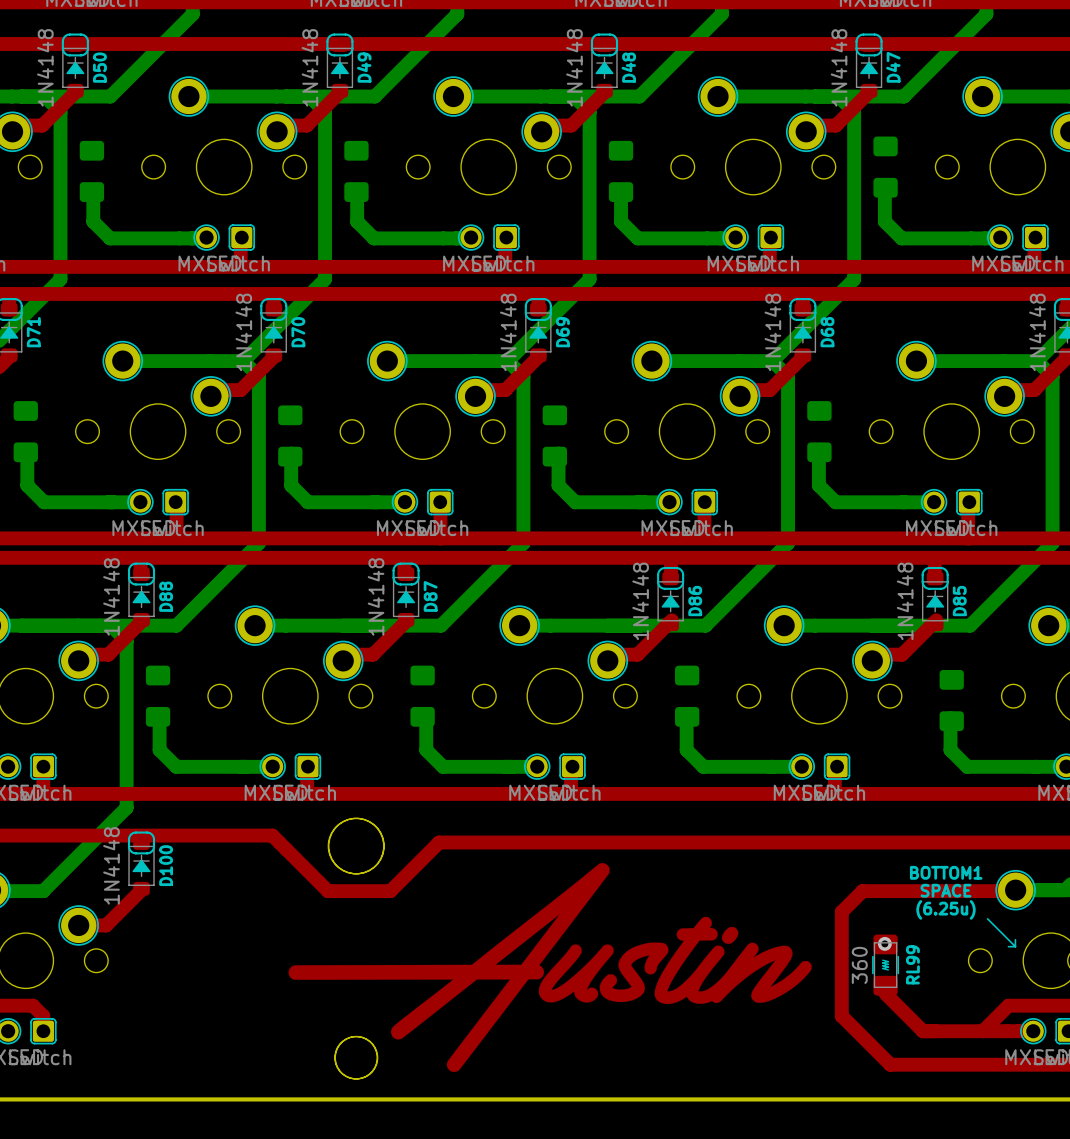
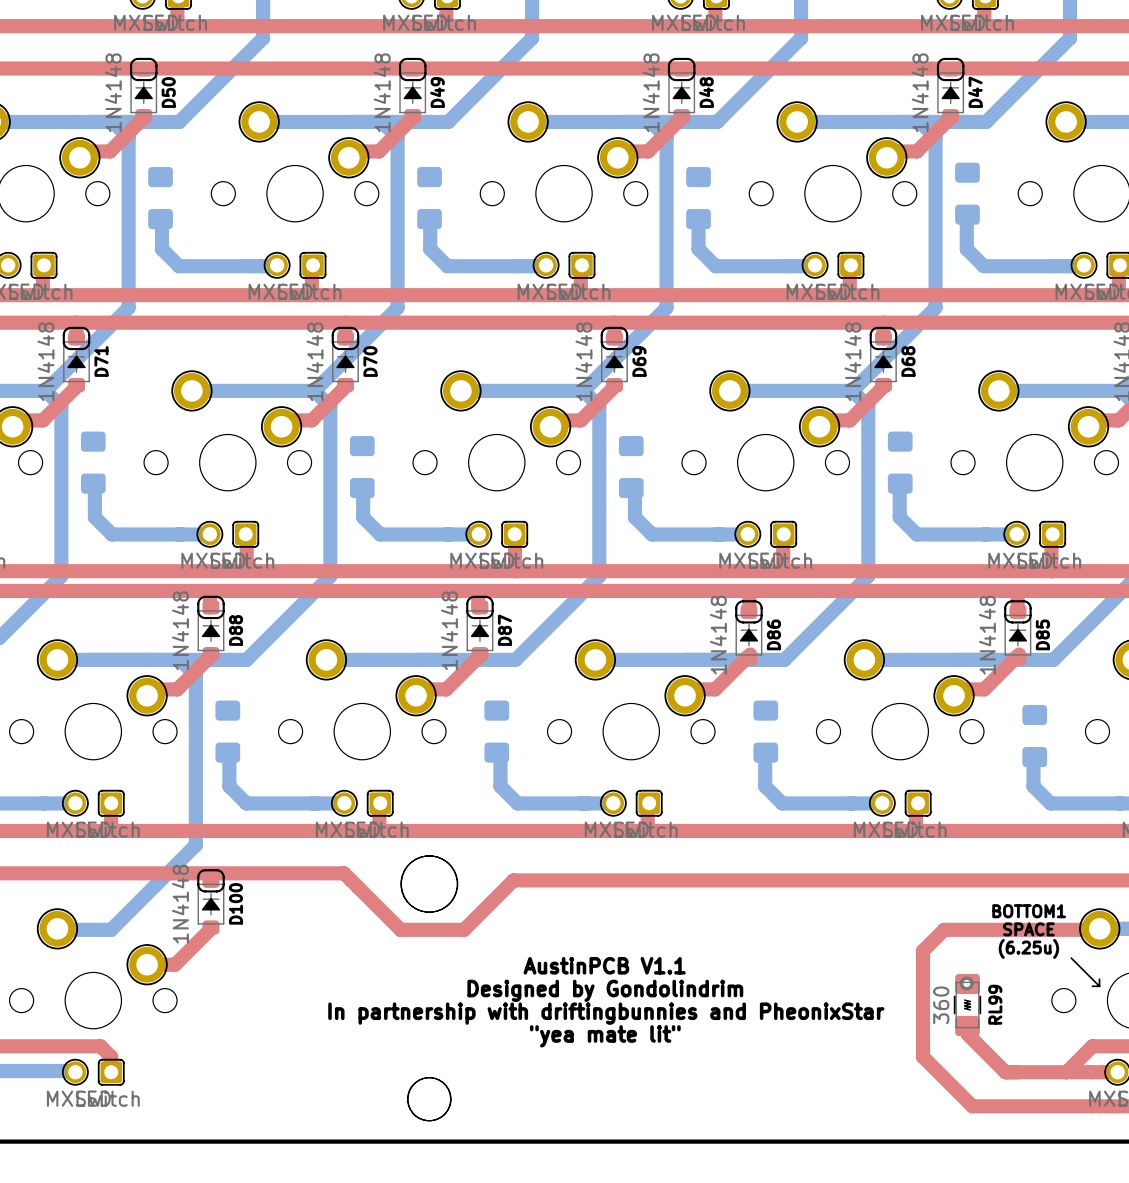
text: none -> AustinPCB V1.1 (604, 965)
text: none -> Designed by Gondolindrim (605, 990)
part: (550, 967) -> none
text: none -> In partnership with driftingbunnies and PheonixStar (606, 1013)
text: none -> "yea mate lit" (605, 1036)

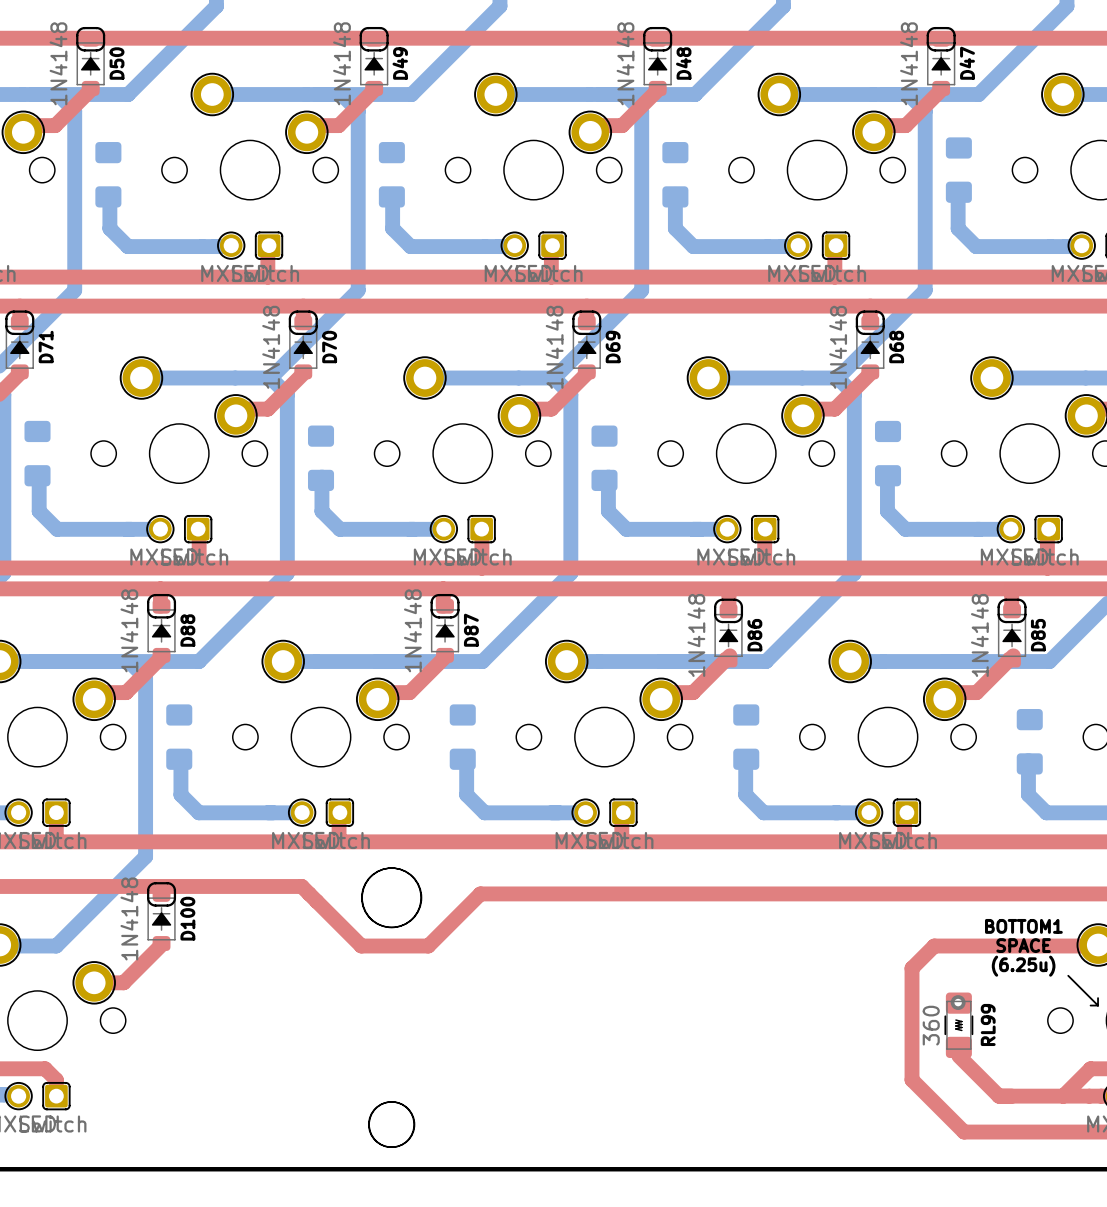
text: AustinPCB V1.1 (604, 965) -> none
text: Designed by Gondolindrim (605, 990) -> none
text: In partnership with driftingbunnies and PheonixStar (606, 1013) -> none
text: "yea mate lit" (605, 1036) -> none

